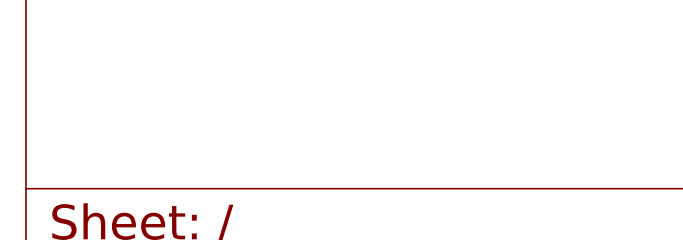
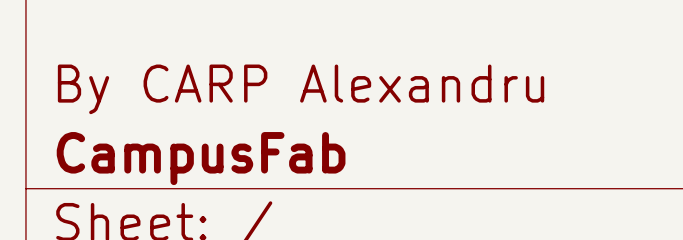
title block: none -> By CARP Alexandru (301, 89)
title block: none -> CampusFab (201, 158)

